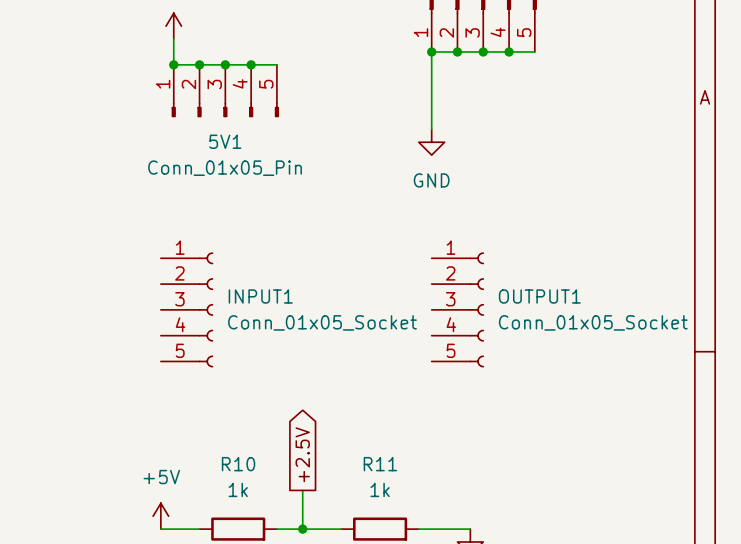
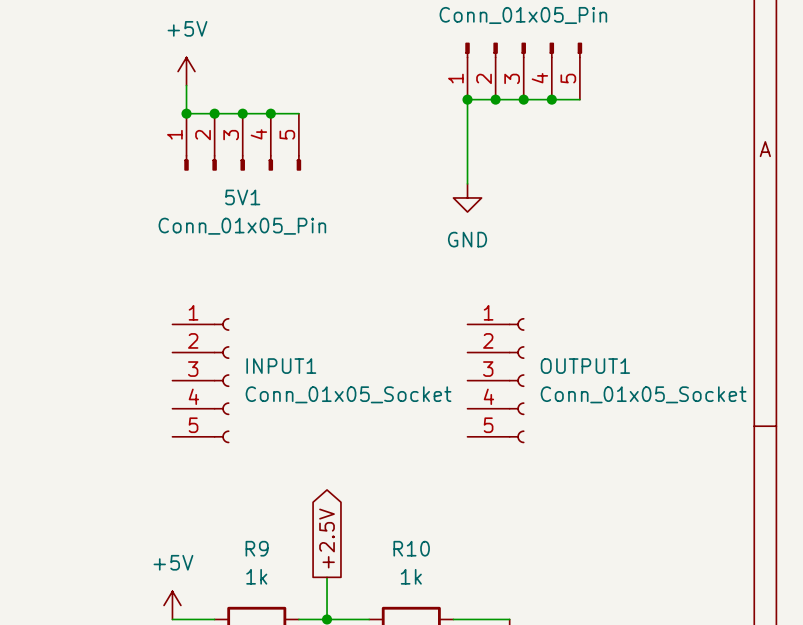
R10 name: R10 (238, 464) -> R9 (257, 548)
R11 name: R11 (380, 464) -> R10 (411, 548)

